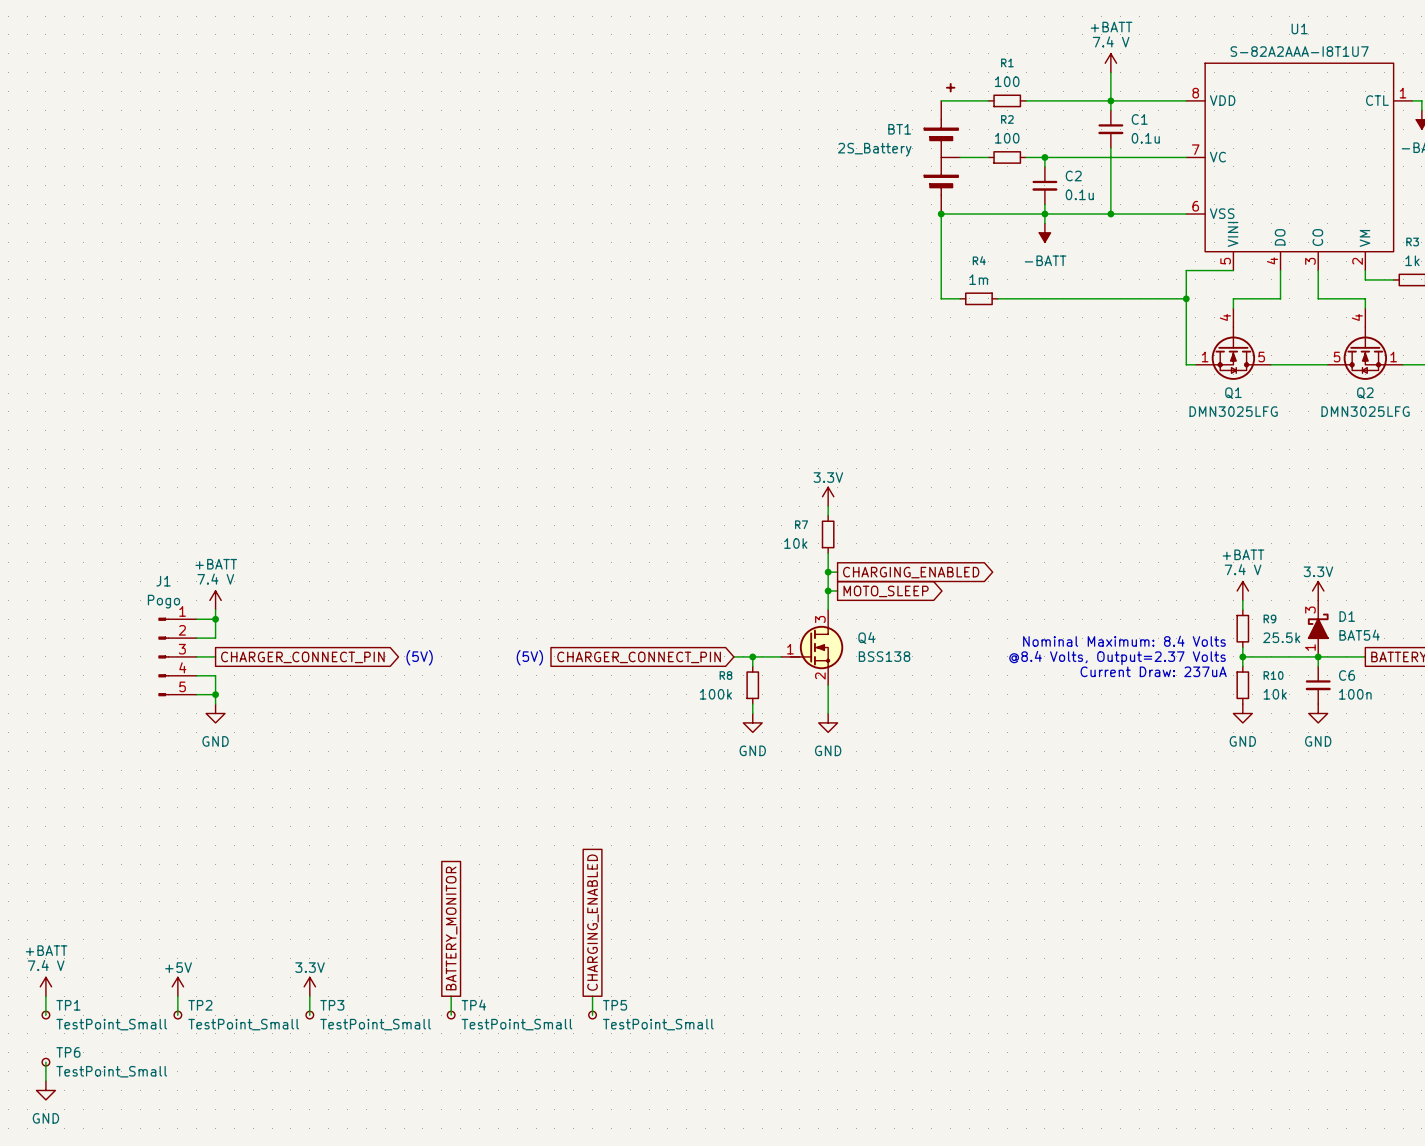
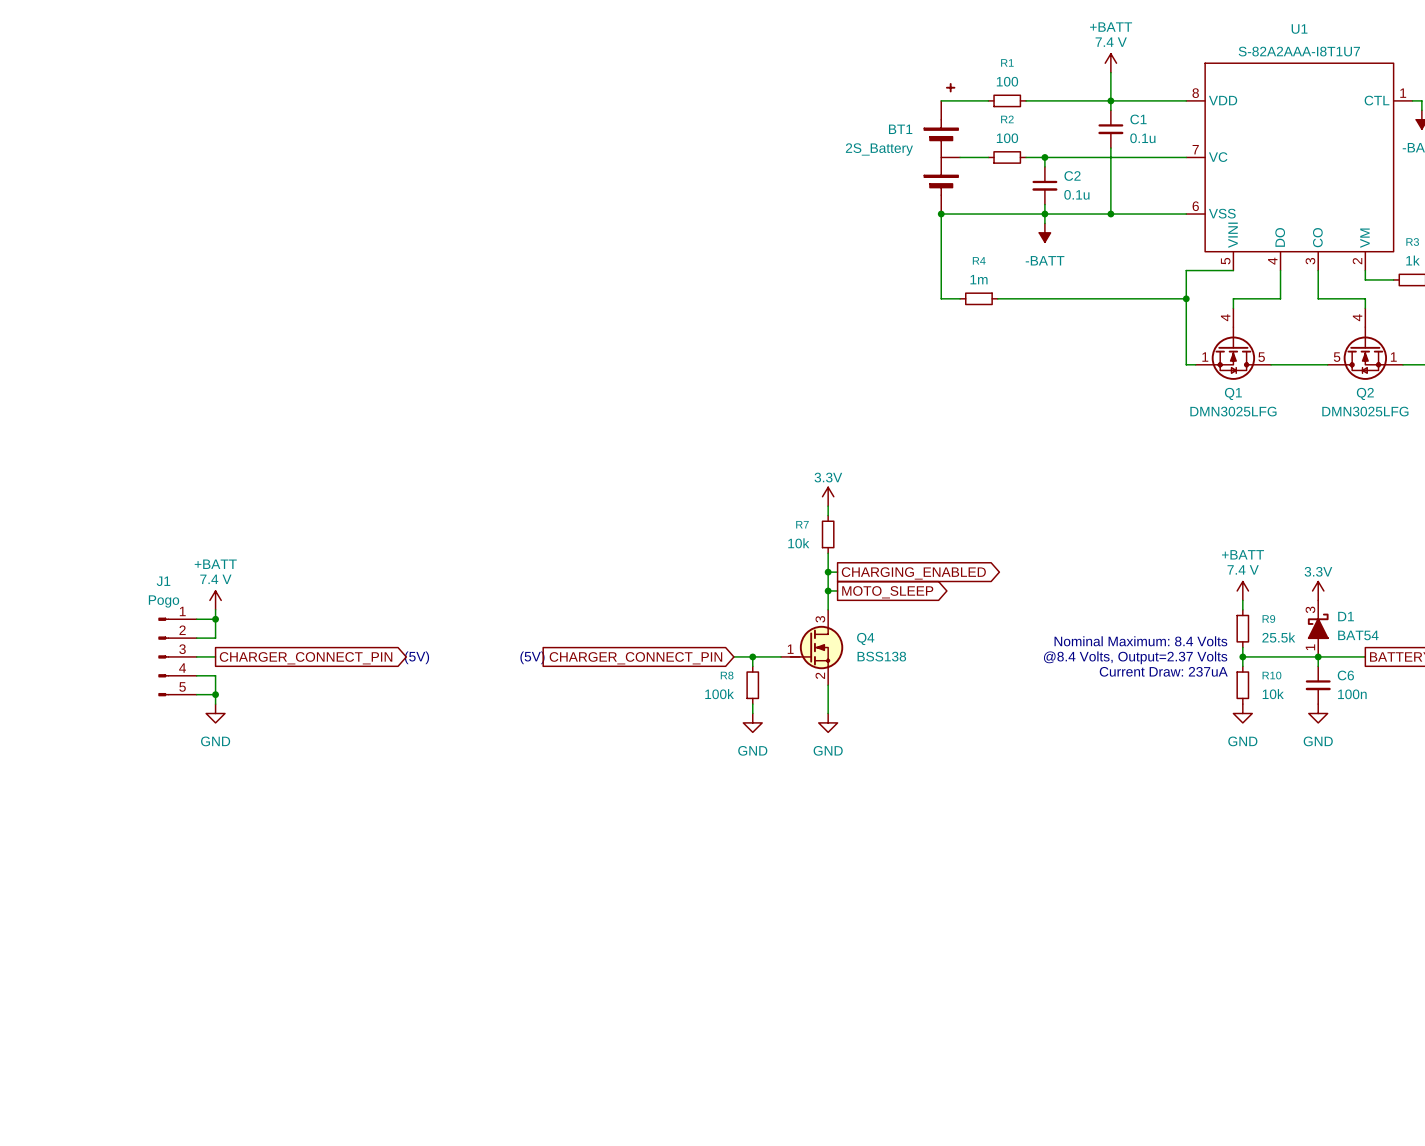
global label: CHARGING_ENABLED (592, 922) -> none
global label: BATTERY_MONITOR (451, 928) -> none
power symbol: +BATT (45, 986) -> none
power symbol: +5V (177, 986) -> none
power symbol: 3.3V (309, 986) -> none
wire: (45, 996) (45, 1015) -> none
wire: (177, 996) (177, 1015) -> none
wire: (309, 996) (309, 1015) -> none
wire: (451, 996) (451, 1015) -> none
wire: (592, 996) (592, 1015) -> none
TP1: TestPoint_Small (45, 1015) -> none
TP2: TestPoint_Small (177, 1015) -> none
TP3: TestPoint_Small (309, 1015) -> none
TP4: TestPoint_Small (451, 1015) -> none
TP5: TestPoint_Small (592, 1015) -> none
wire: (45, 1062) (45, 1081) -> none
TP6: TestPoint_Small (45, 1062) -> none
power symbol: GND (45, 1090) -> none

